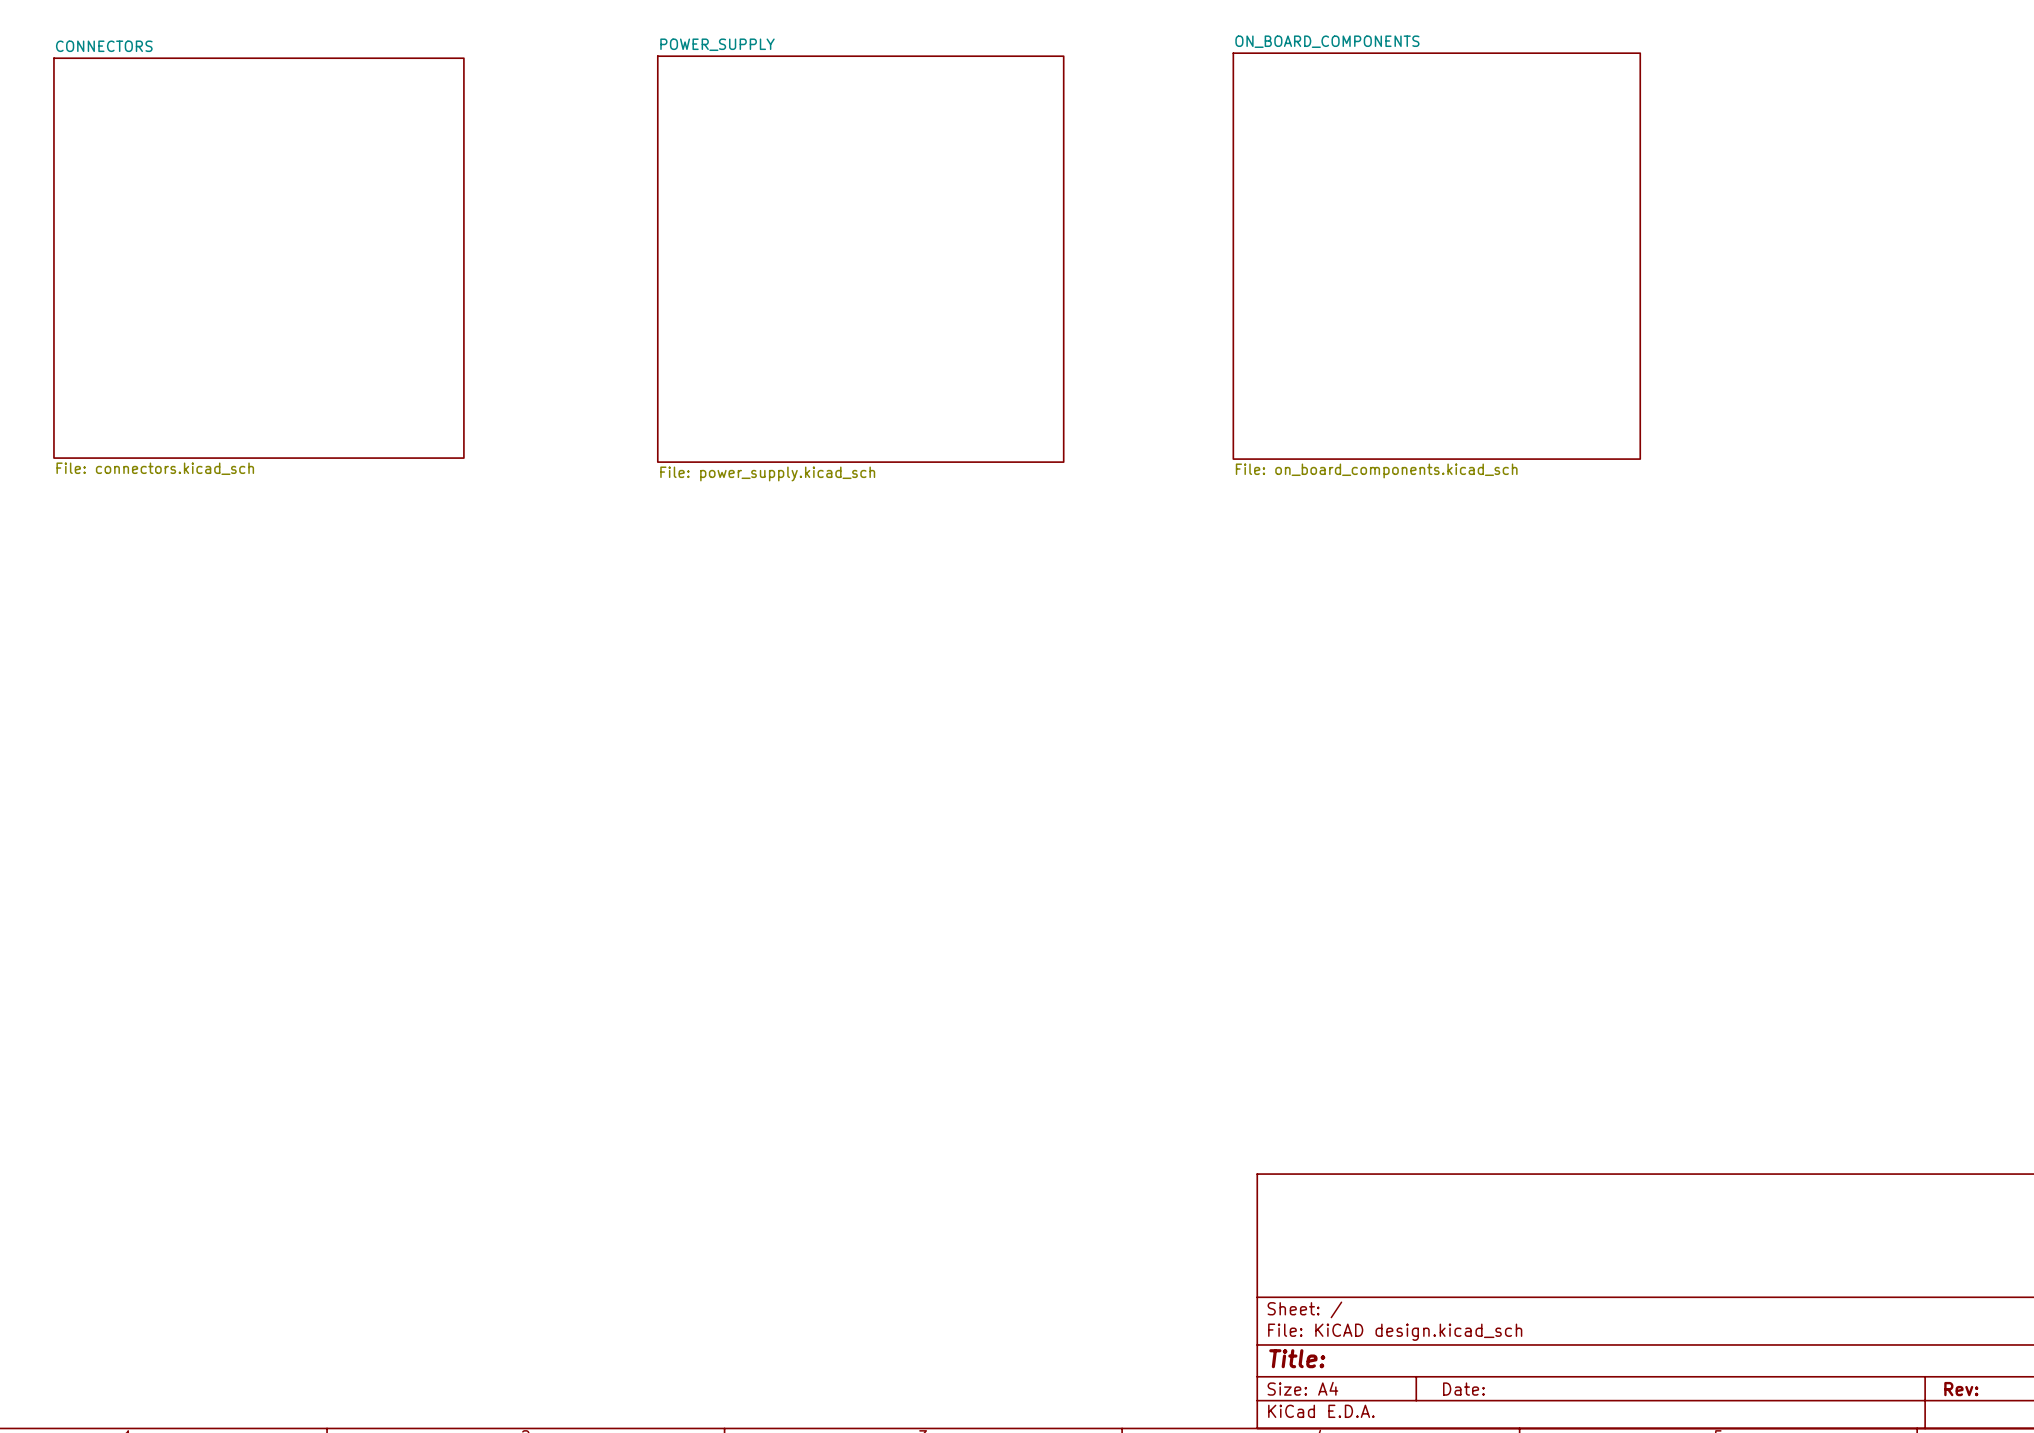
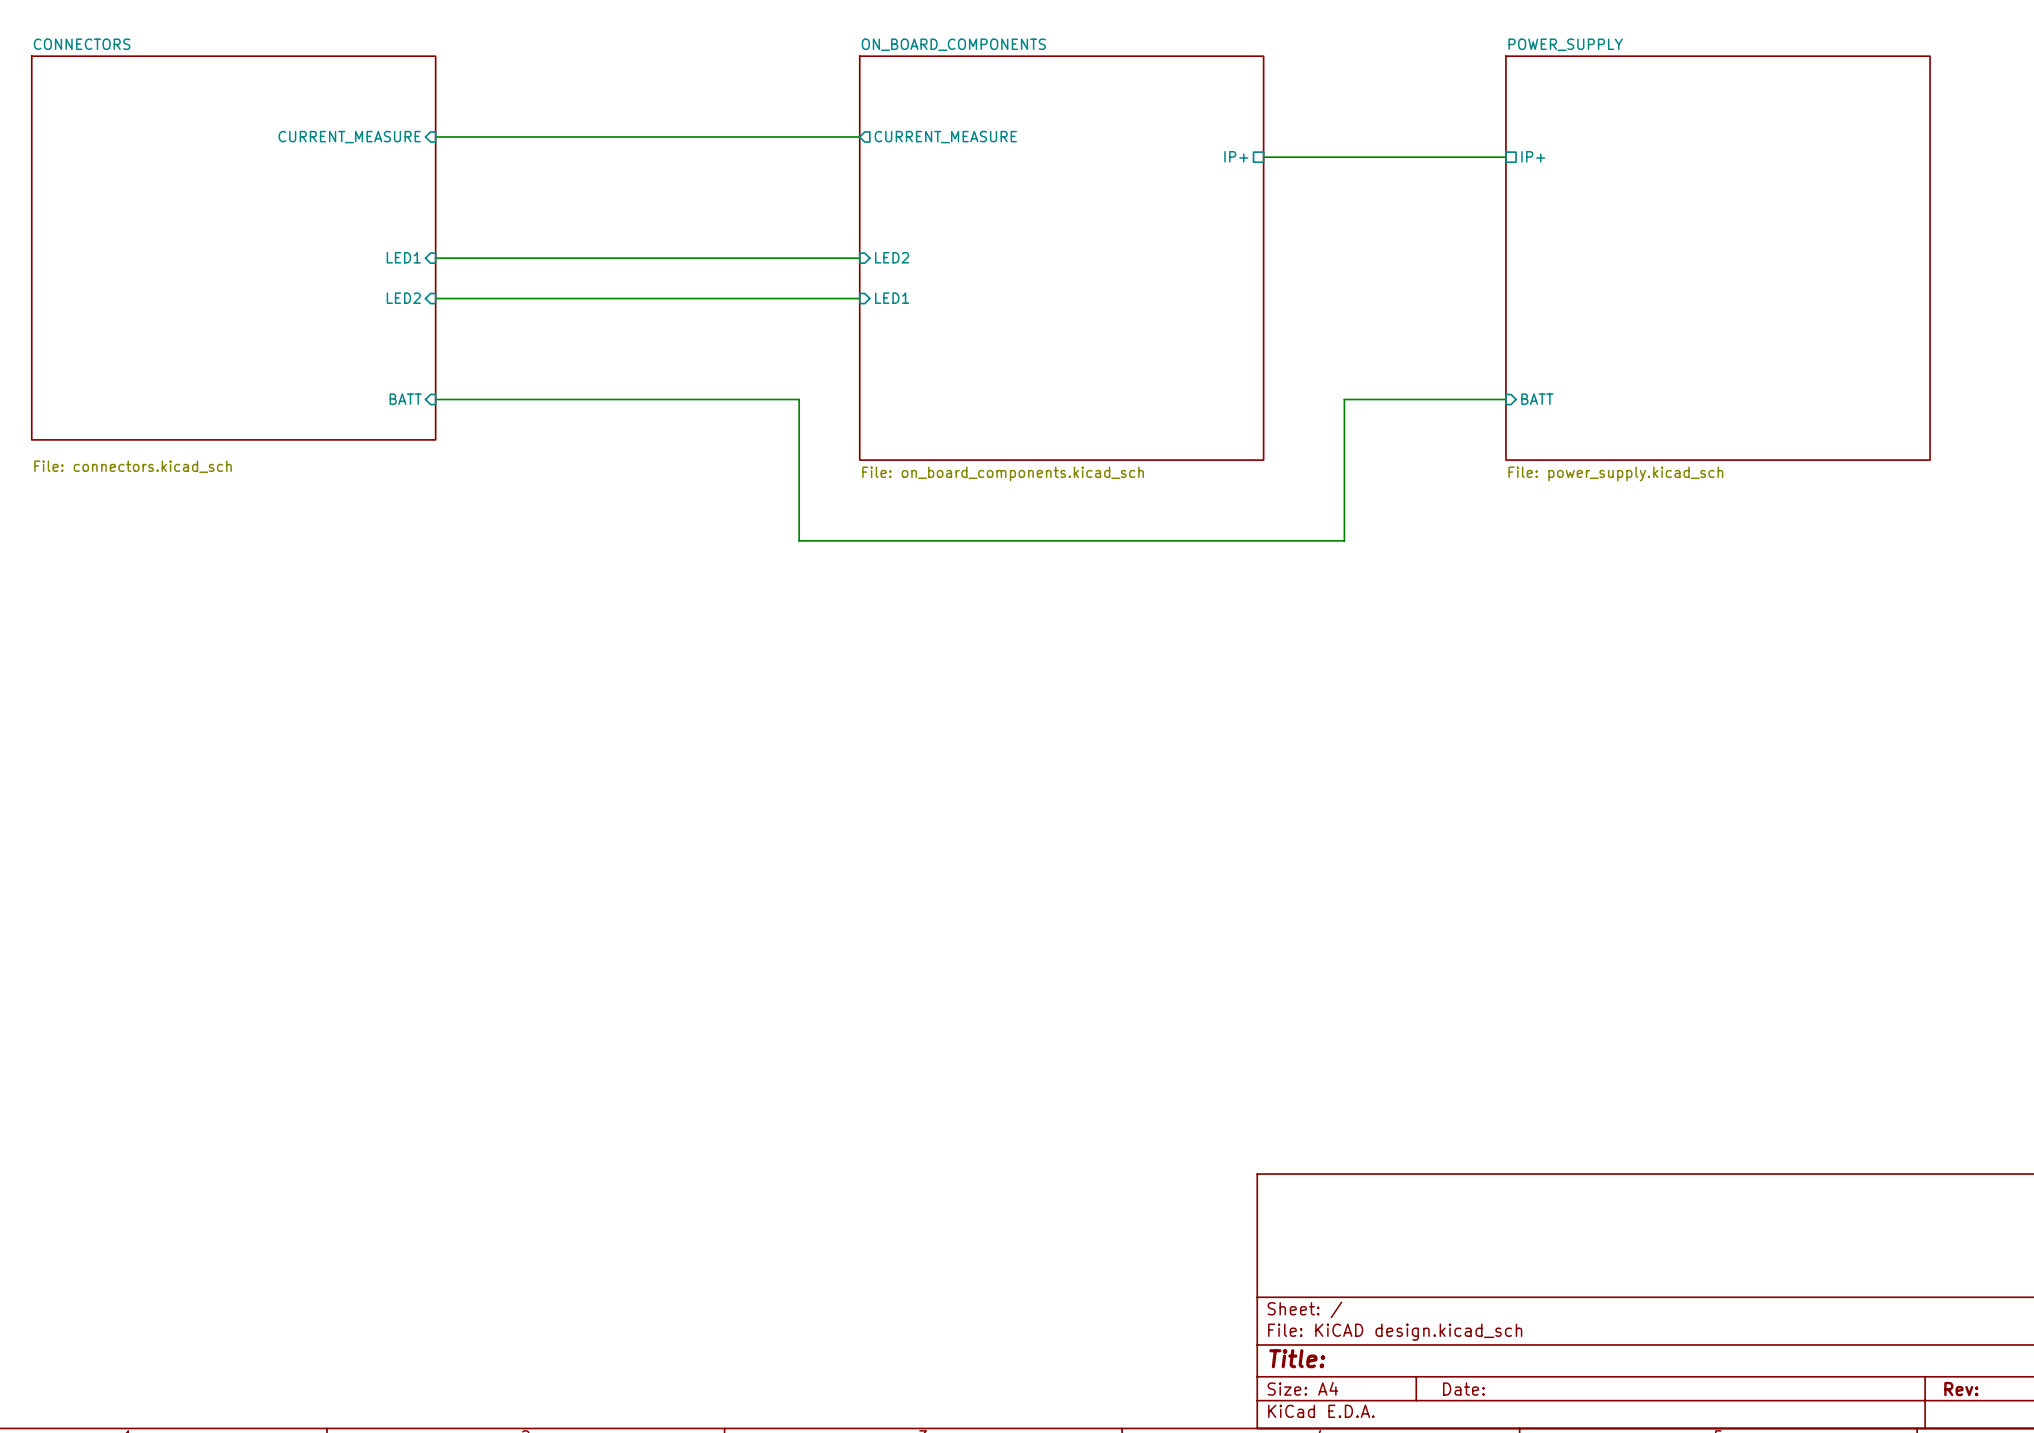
wire: none -> (435, 136) (859, 136)
sheet pin: none -> CURRENT_MEASURE (349, 137)
sheet pin: none -> CURRENT_MEASURE (945, 137)
sheet pin: none -> IP+ (1236, 156)
sheet pin: none -> IP+ (1533, 156)
wire: none -> (1263, 157) (1505, 157)
sheet CONNECTORS: none -> File: connectors.kicad_sch (233, 248)
sheet ON_BOARD_COMPONENTS: File: on_board_components.kicad_sch (1436, 256) -> none
sheet pin: none -> LED1 (403, 257)
sheet pin: none -> LED2 (892, 257)
sheet CONNECTORS: File: connectors.kicad_sch (258, 258) -> none
wire: none -> (435, 258) (859, 258)
sheet ON_BOARD_COMPONENTS: none -> File: on_board_components.kicad_sch (1061, 258)
sheet POWER_SUPPLY: none -> File: power_supply.kicad_sch (1718, 258)
sheet POWER_SUPPLY: File: power_supply.kicad_sch (860, 259) -> none
sheet pin: none -> LED2 (403, 298)
wire: none -> (435, 298) (859, 298)
sheet pin: none -> LED1 (892, 298)
sheet pin: none -> BATT (405, 399)
wire: none -> (435, 399) (799, 399) (799, 540) (1344, 540) (1344, 399) (1505, 399)
sheet pin: none -> BATT (1537, 399)

